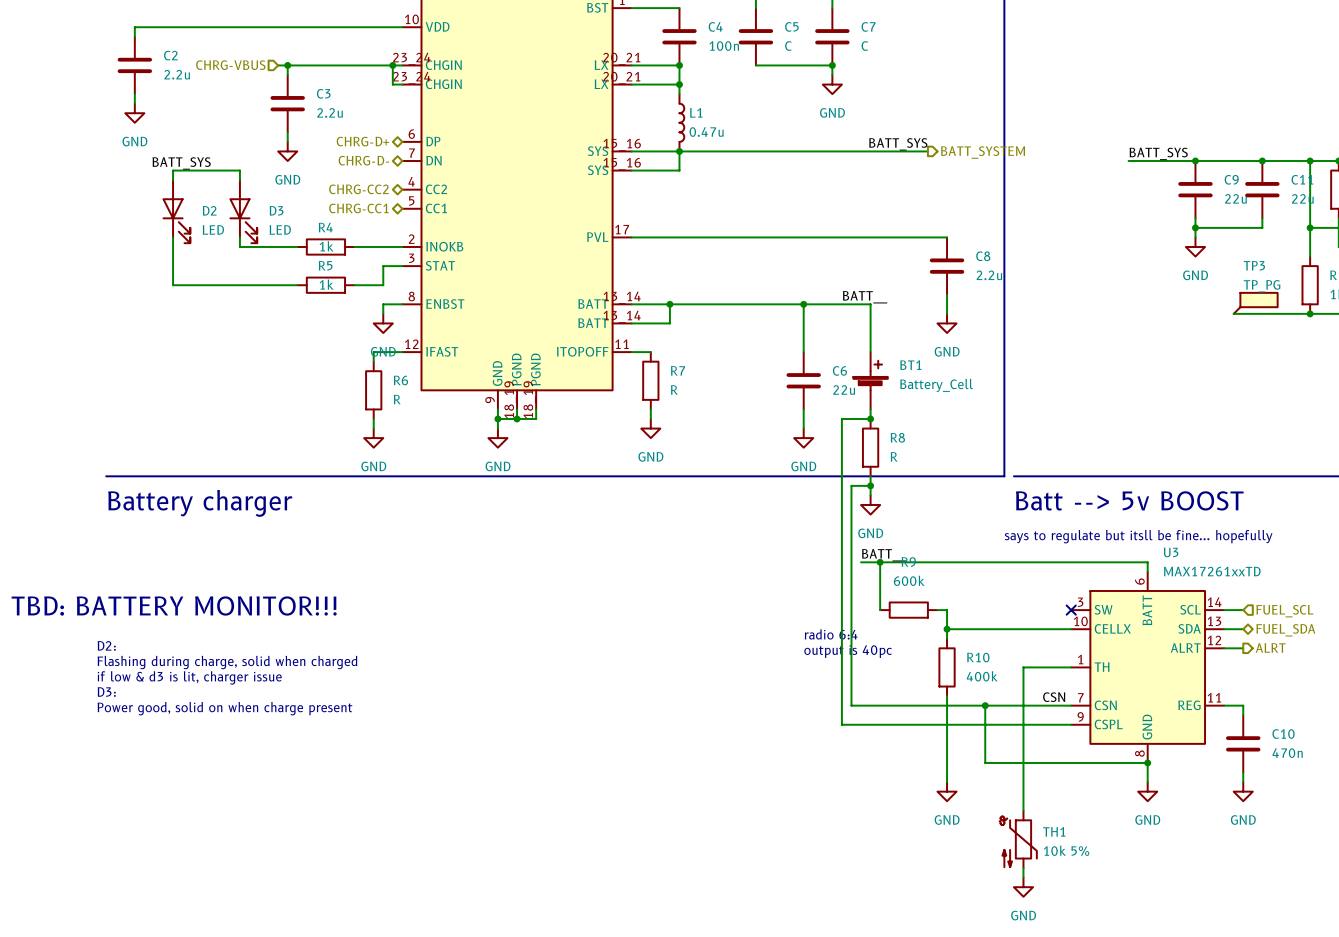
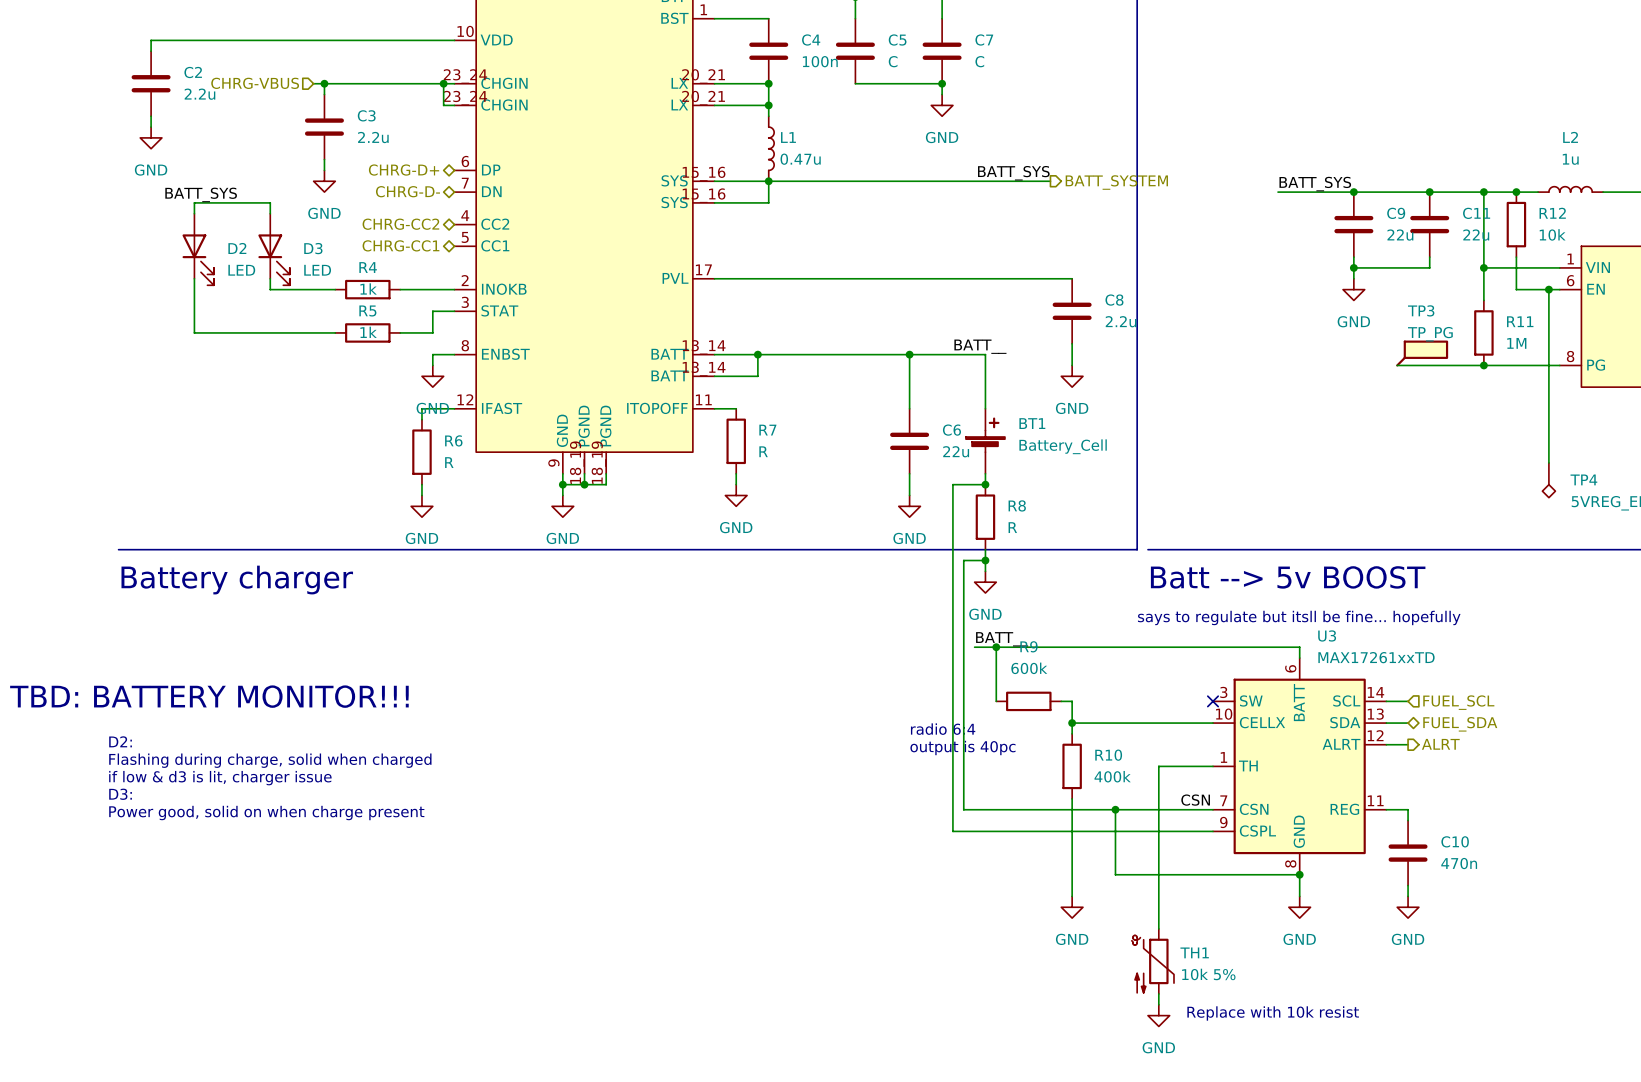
text: none -> Replace with 10k resist (1273, 1013)

